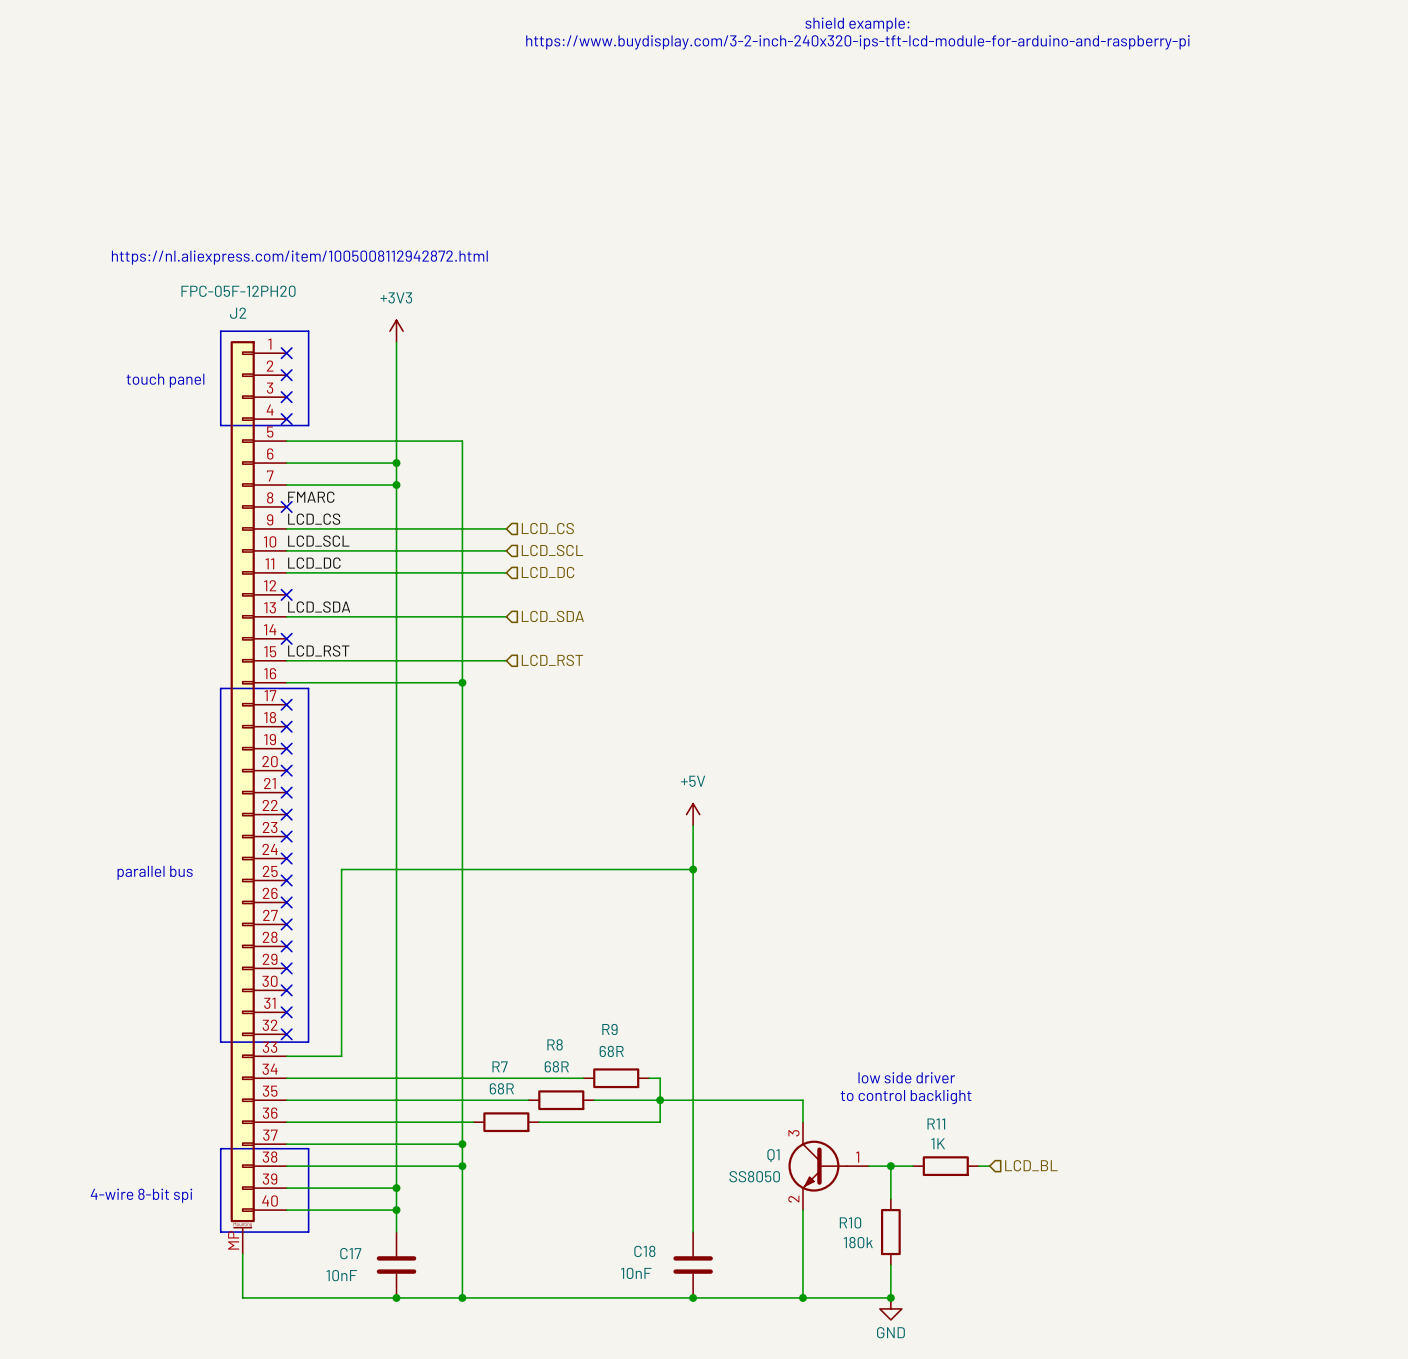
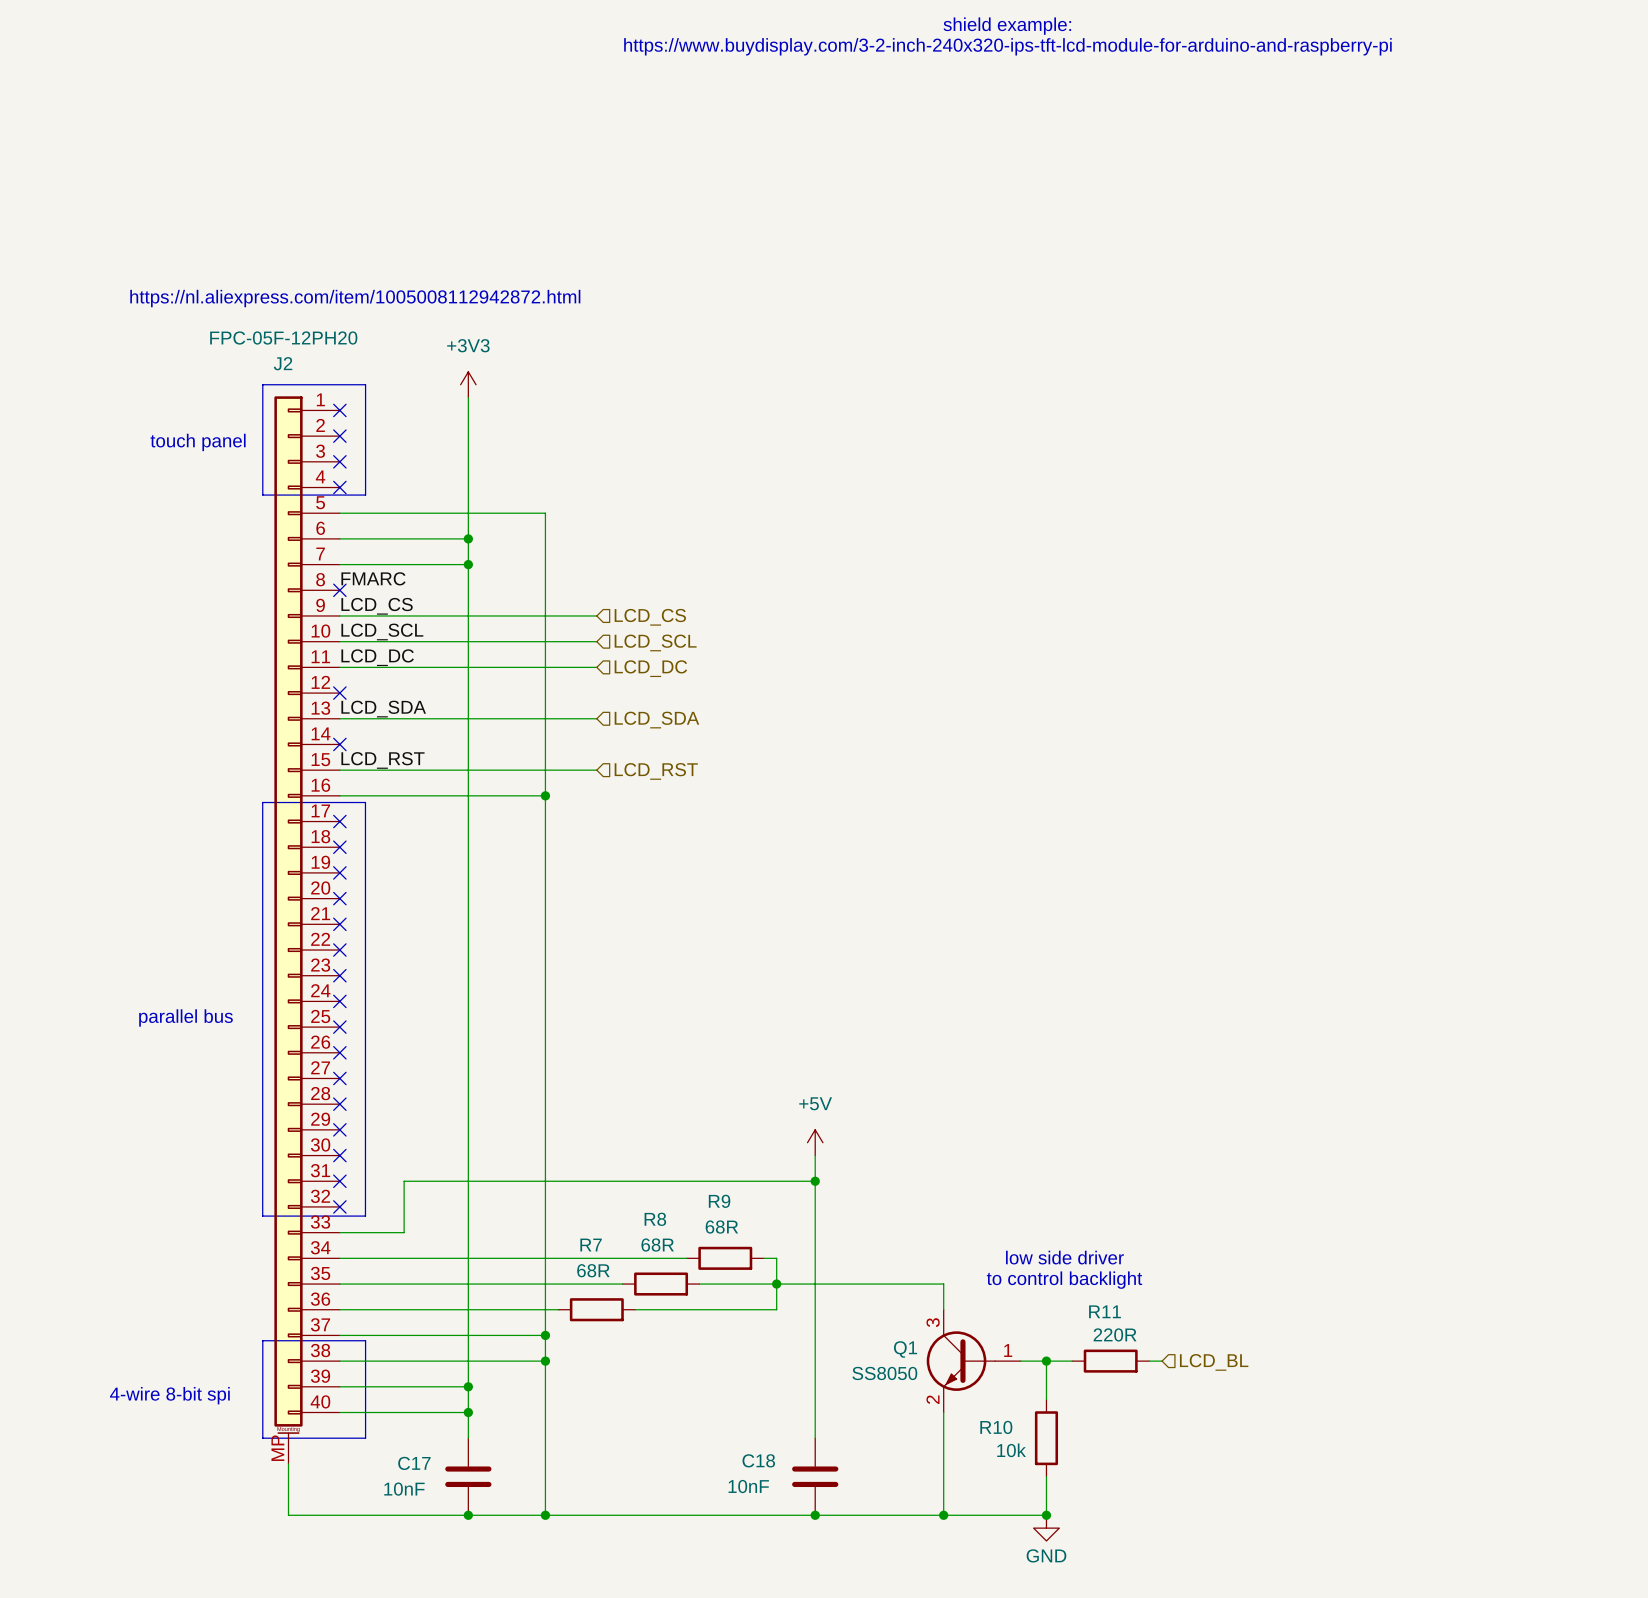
power symbol position: +5V (693, 814) -> +5V (815, 1142)
wire: (693, 825) (693, 990) -> none
wire: (693, 869) (341, 869) (341, 1012) -> (815, 1181) (404, 1181)
junction: (693, 869) -> none
junction: none -> (815, 1181)
R11 value: 1K (938, 1143) -> 220R (1115, 1334)
R10 value: 180k (858, 1242) -> 10k (1011, 1450)

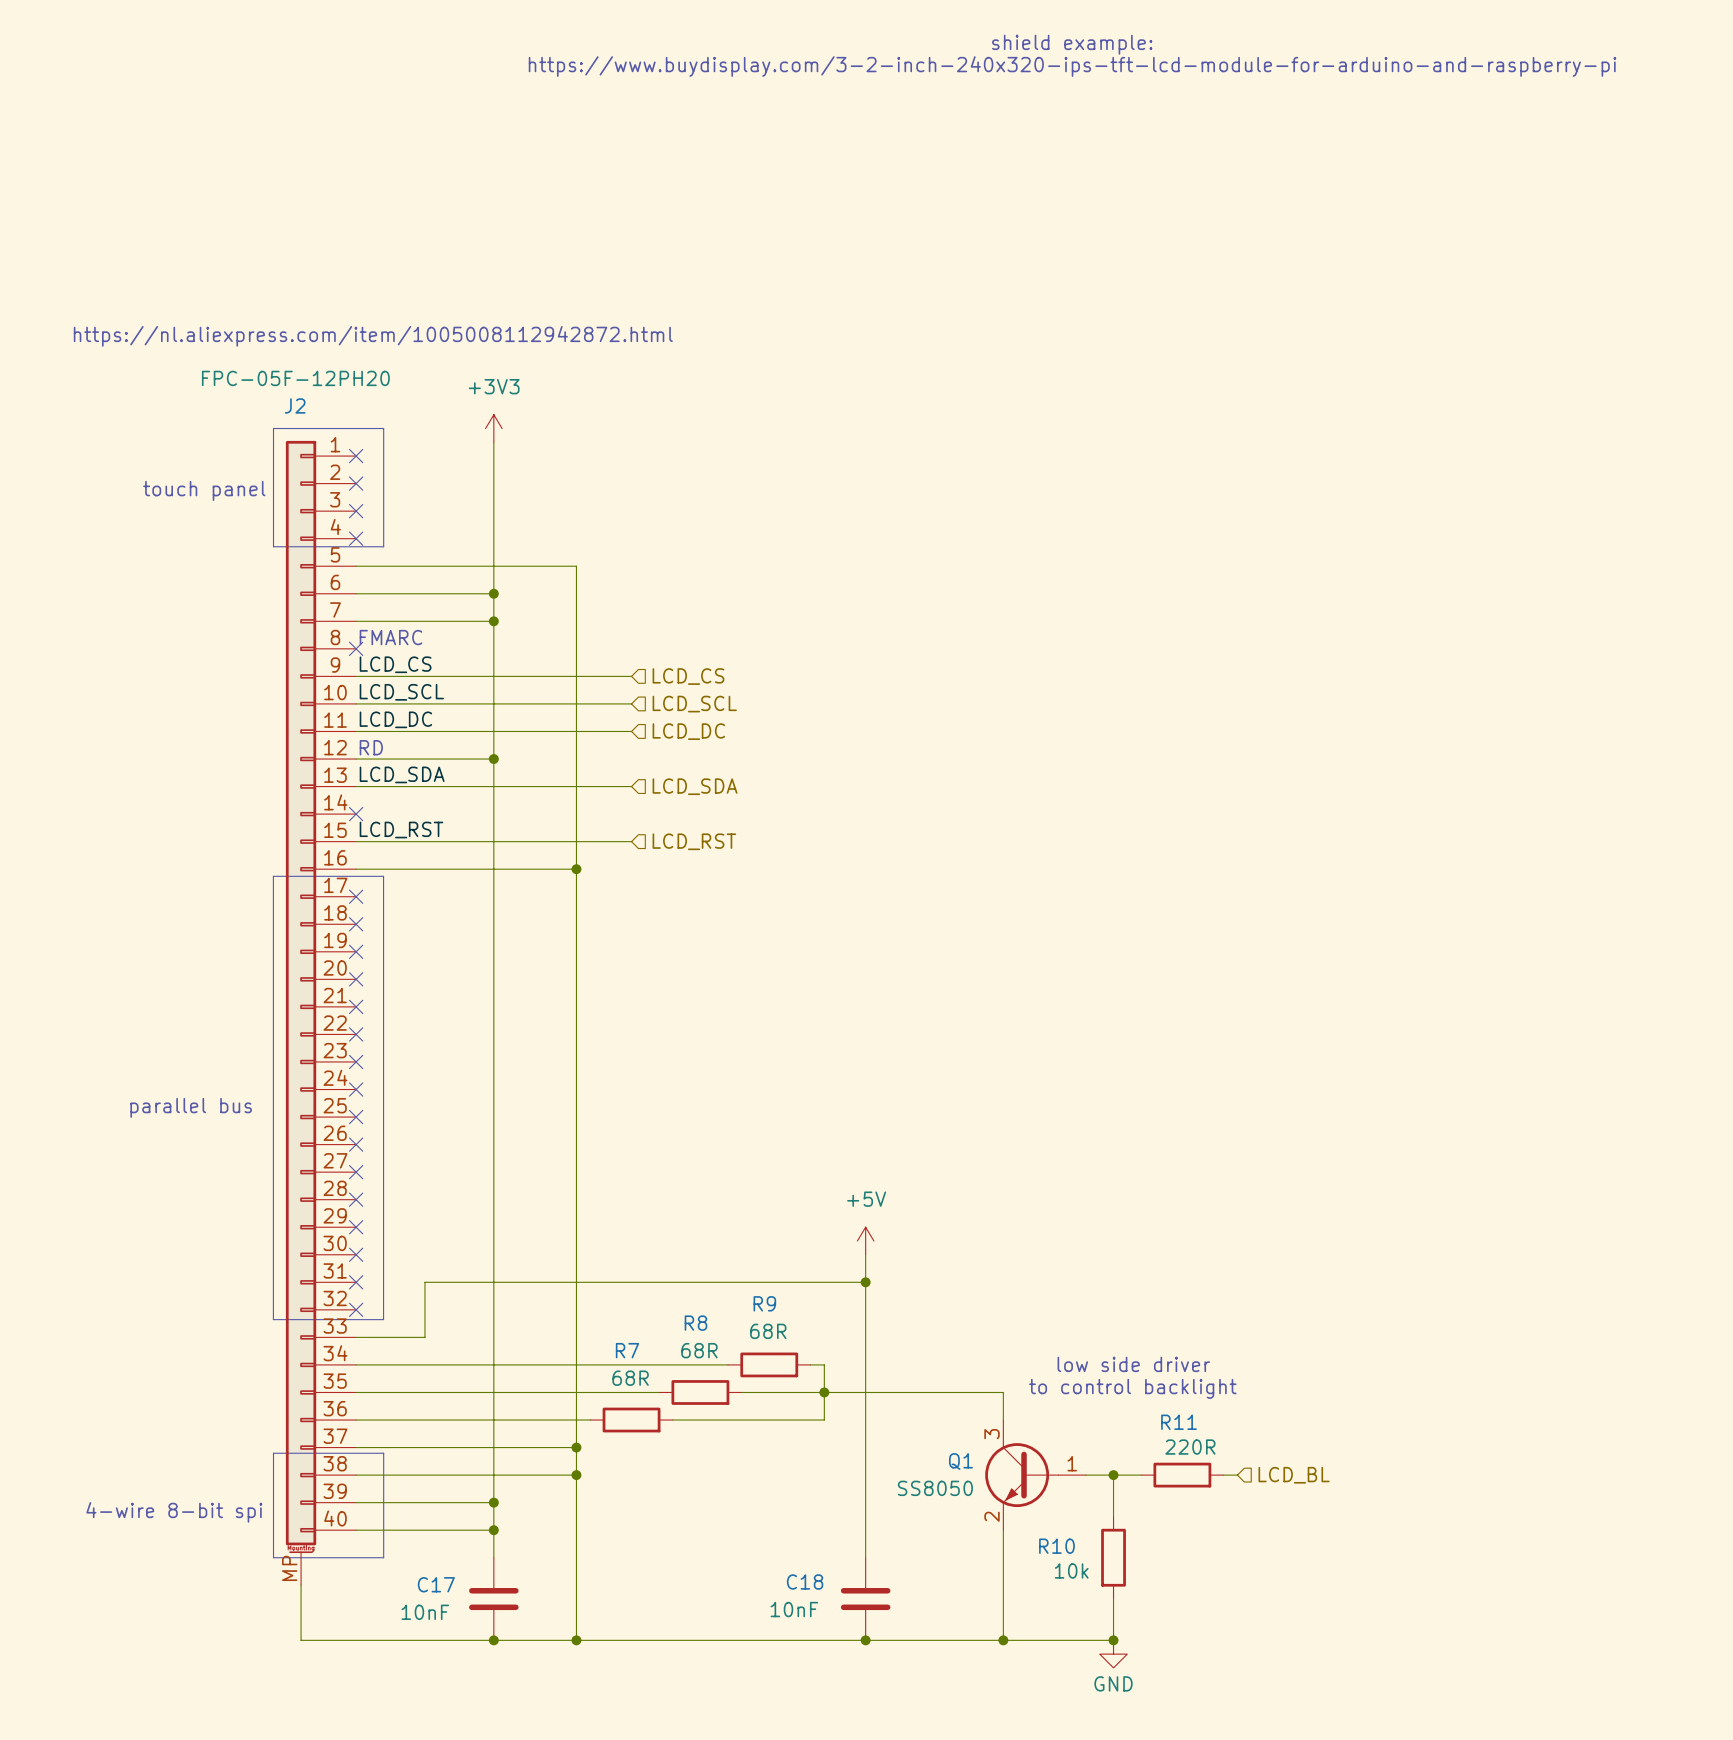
label: FMARC (373, 578) -> none
text: none -> FMARC (390, 637)
text: none -> RD (371, 747)
wire: none -> (356, 759) (493, 759)
no-connect mark: (339, 693) -> none
junction: none -> (493, 759)

